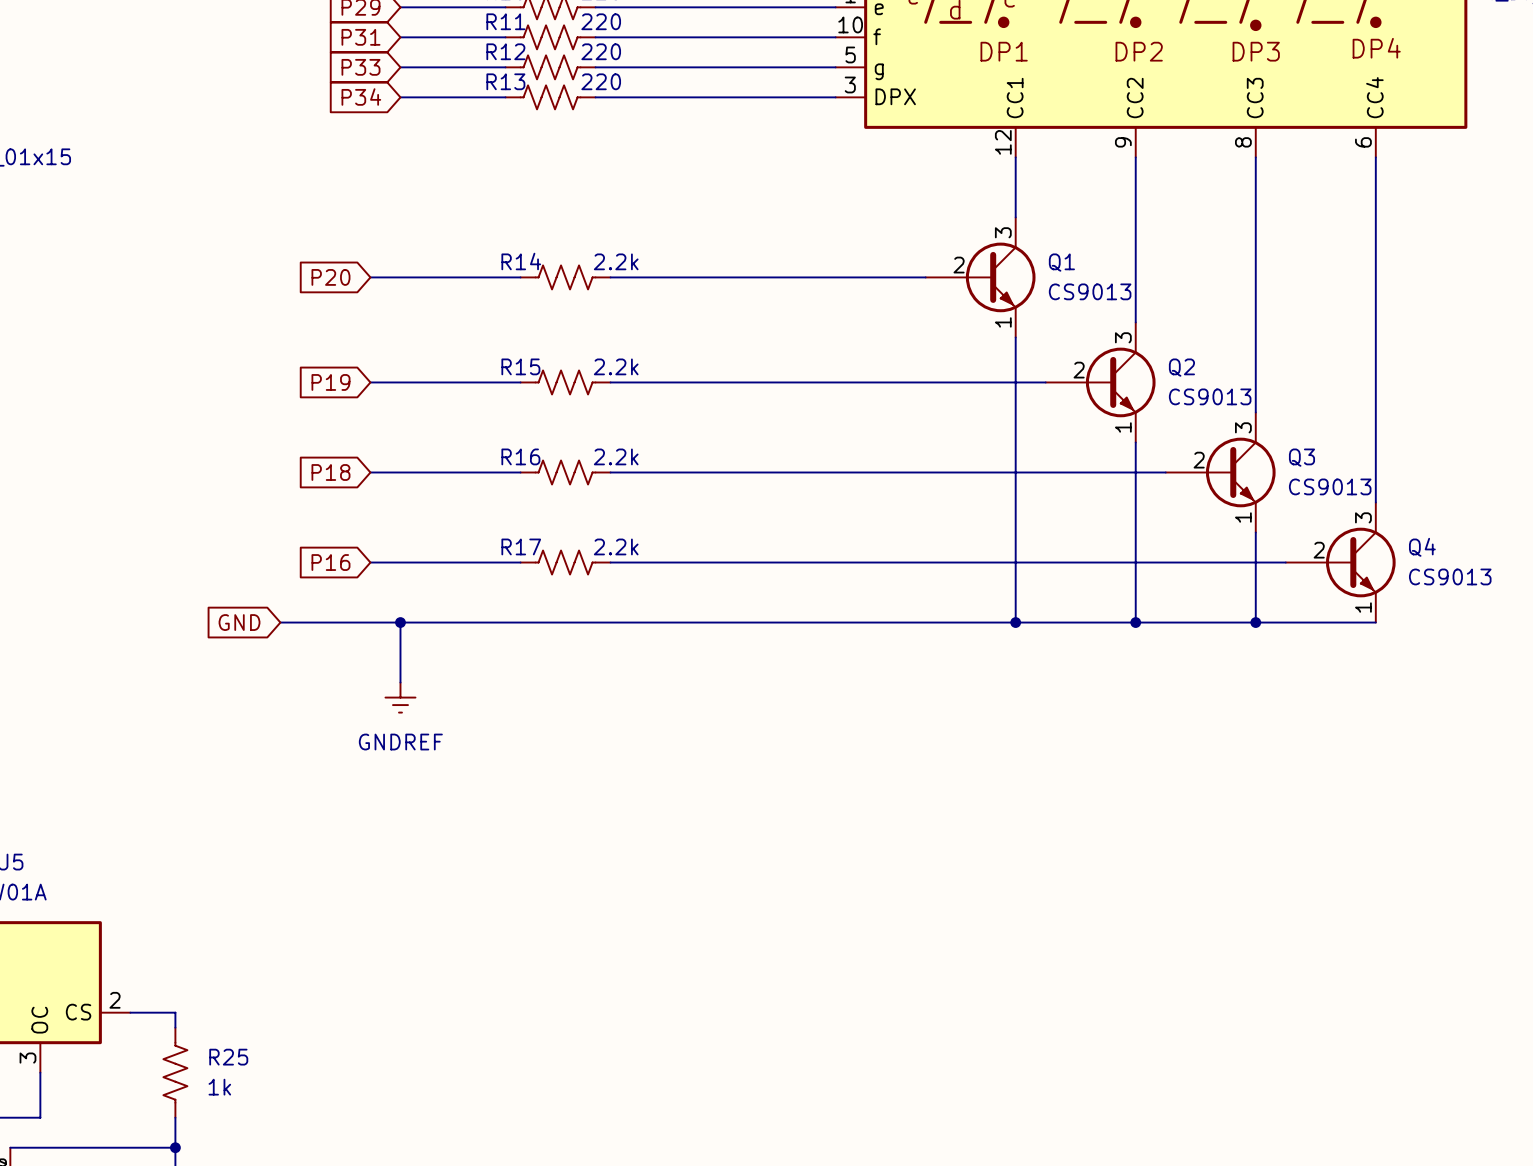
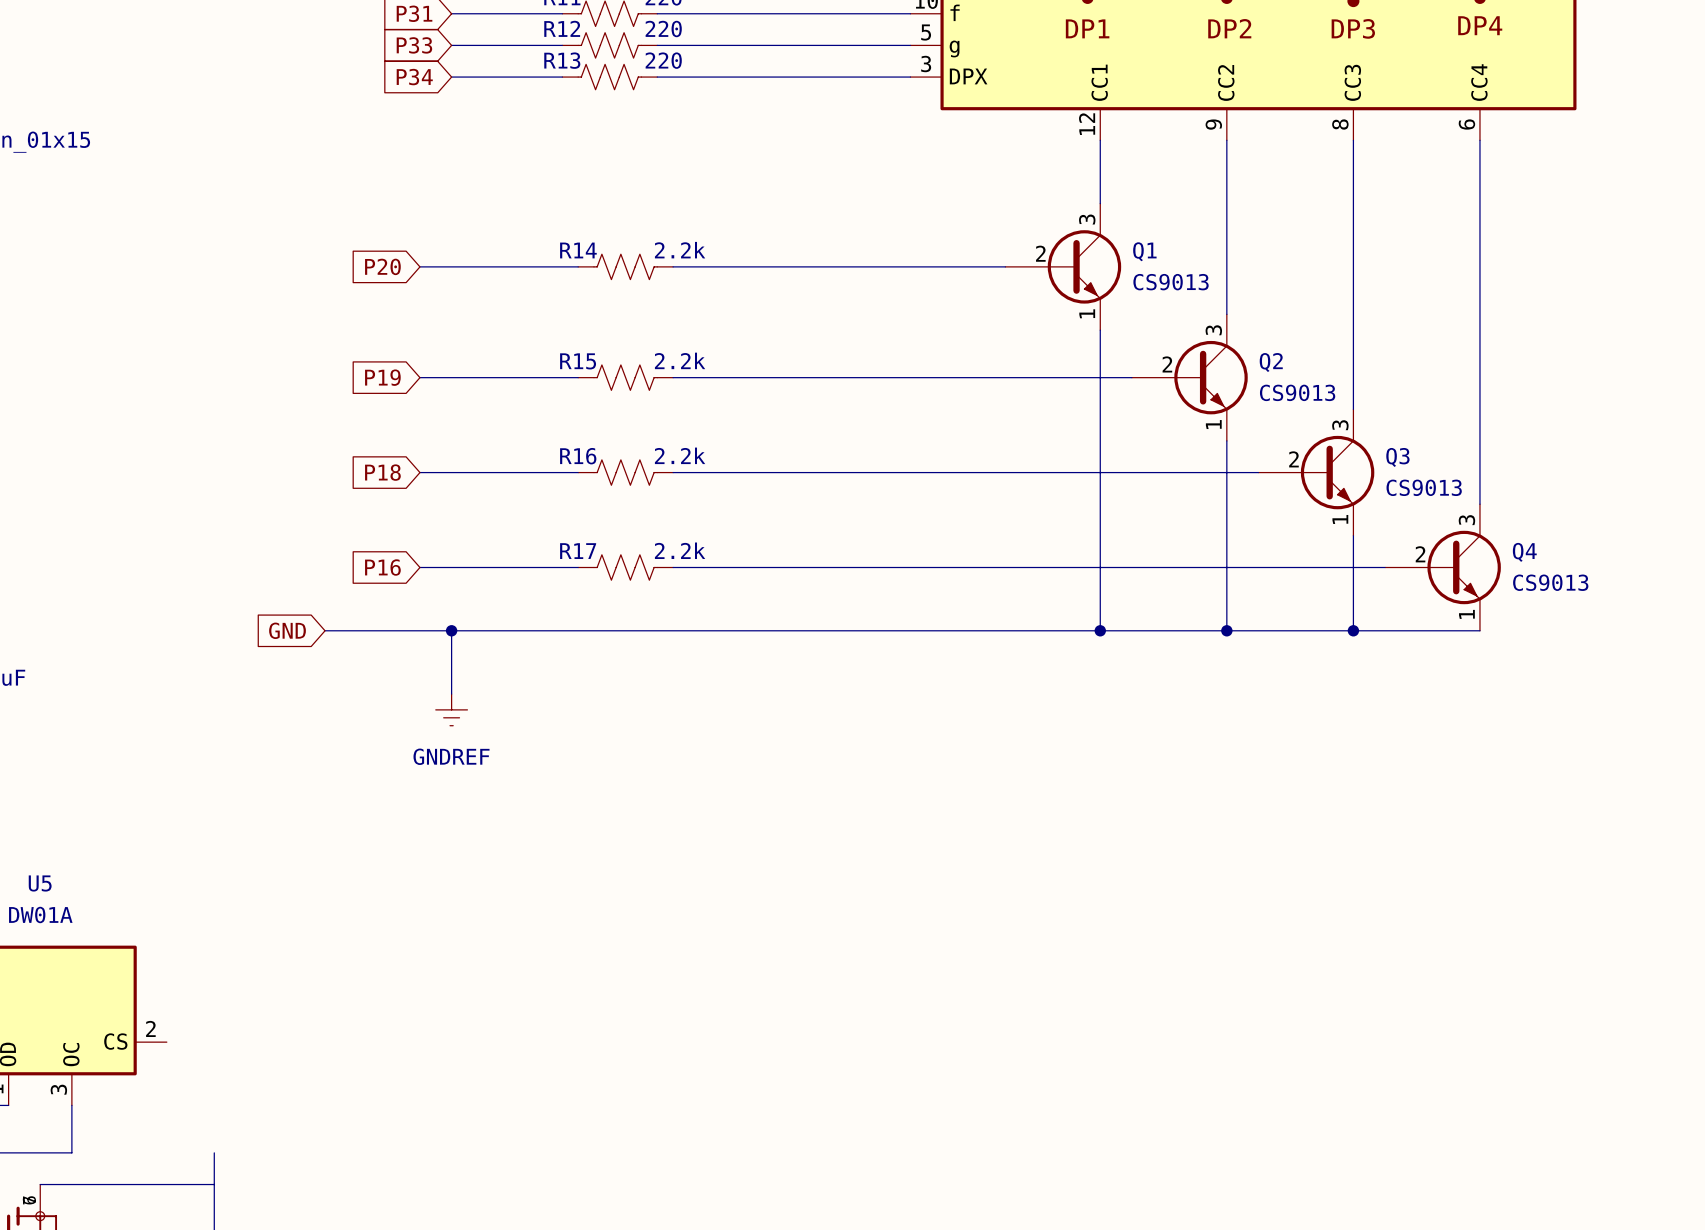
wire: (130, 1012) (175, 1012) (175, 1027) -> none
R25: 1k (175, 1072) -> none
junction: (175, 1147) -> none

